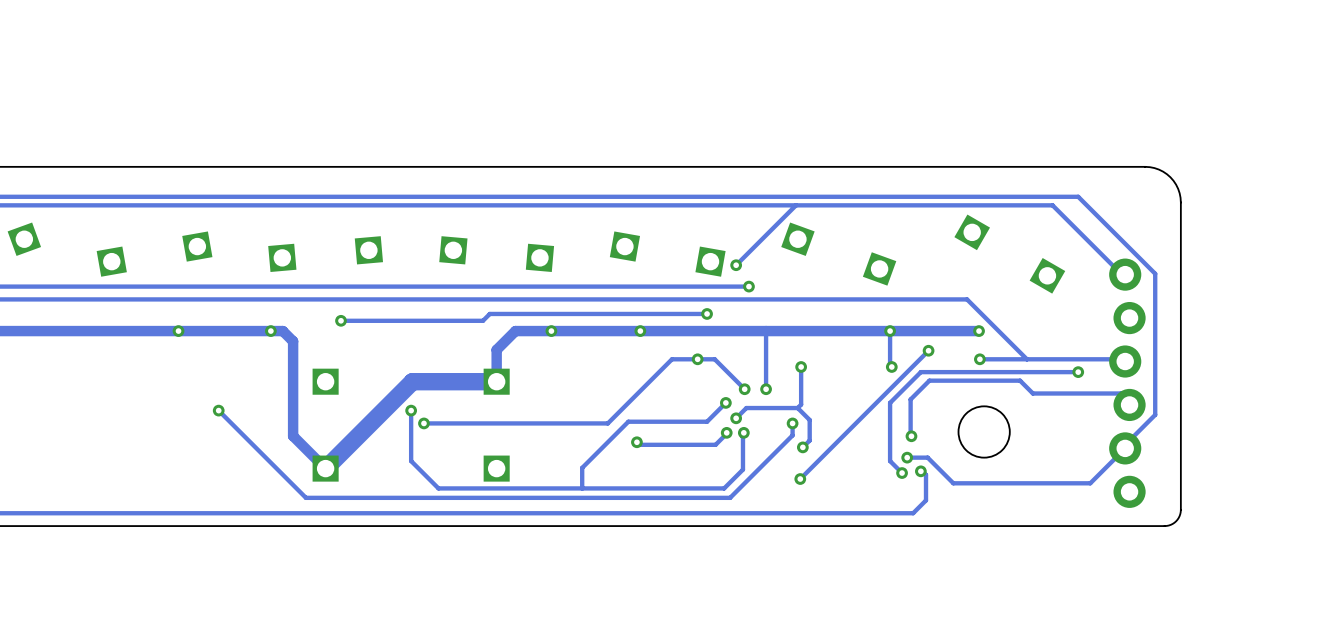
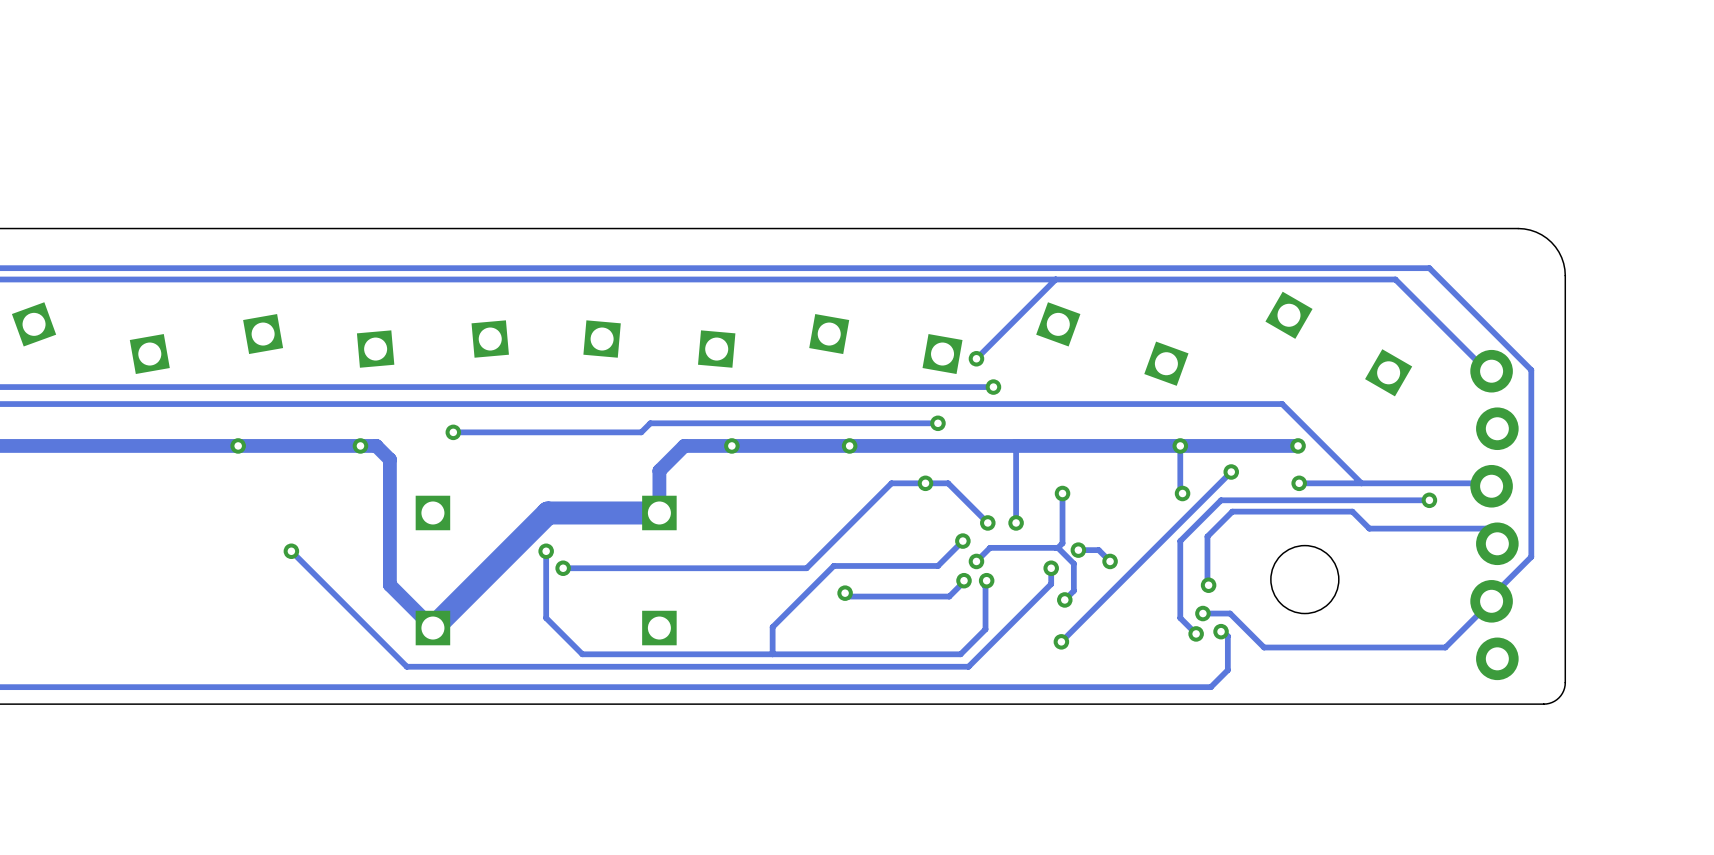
track: none -> (1078, 550) (1098, 550) (1110, 561)
via: none -> (1078, 550)
via: none -> (1110, 561)

